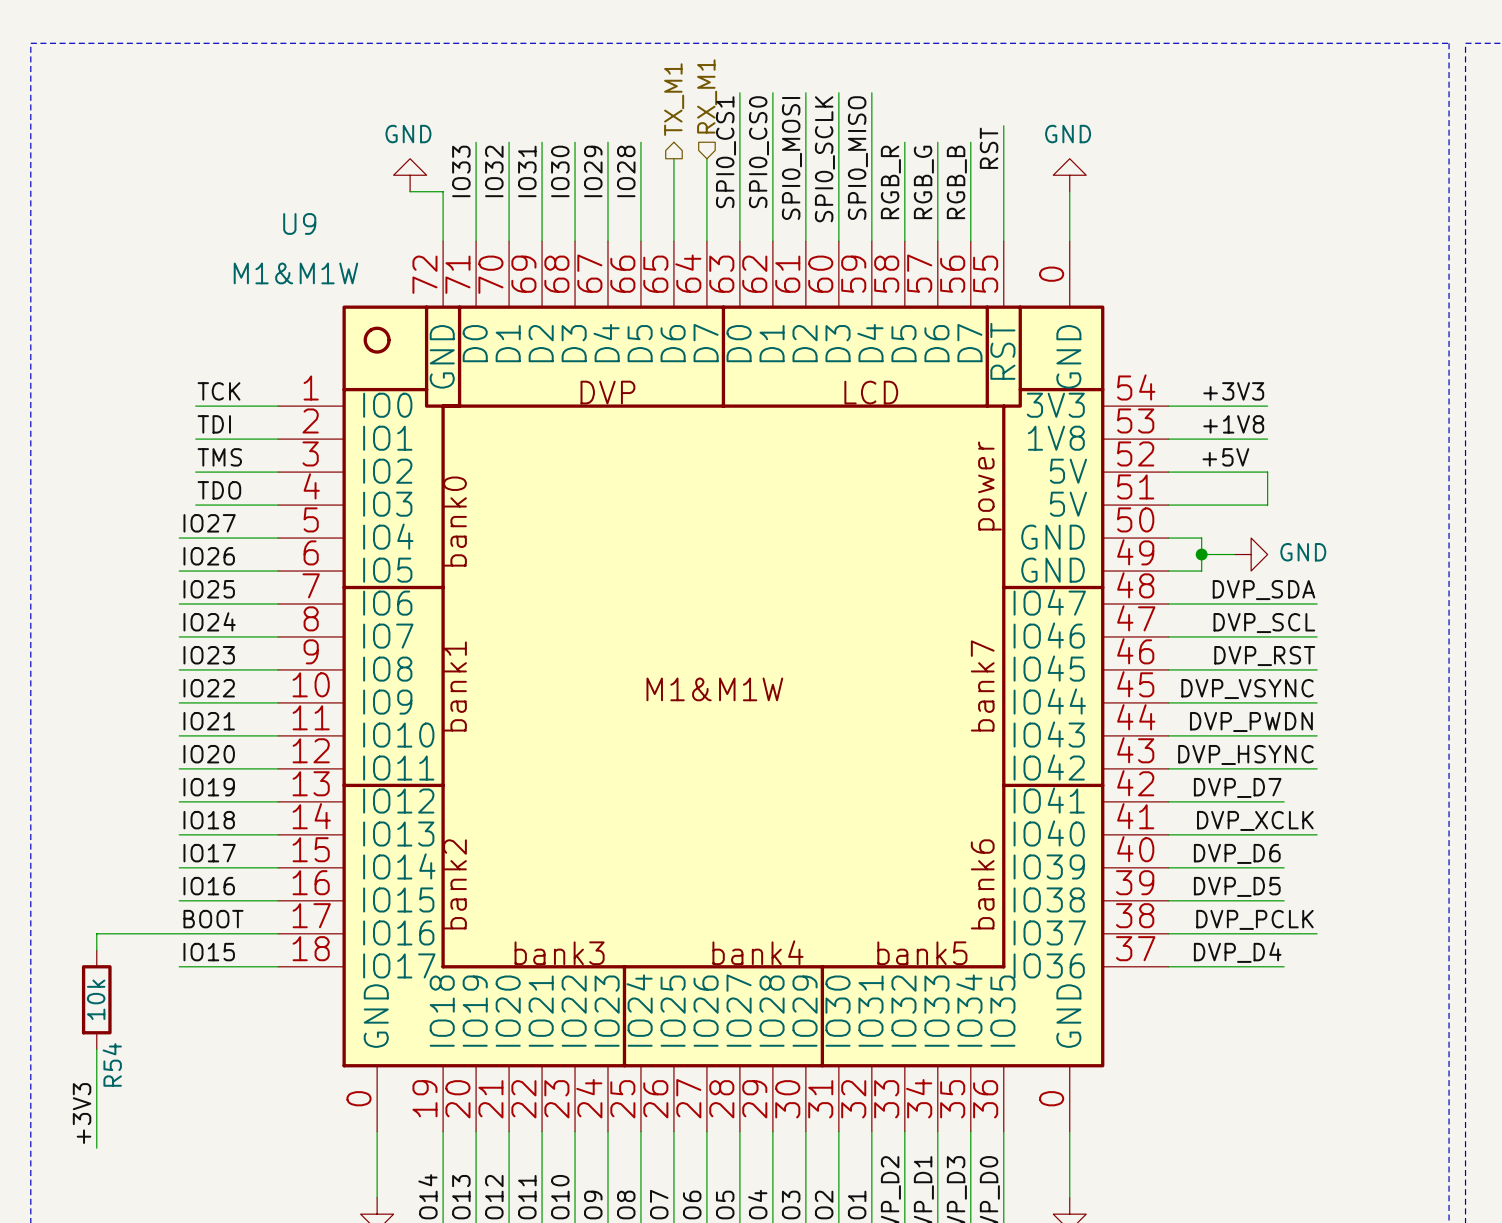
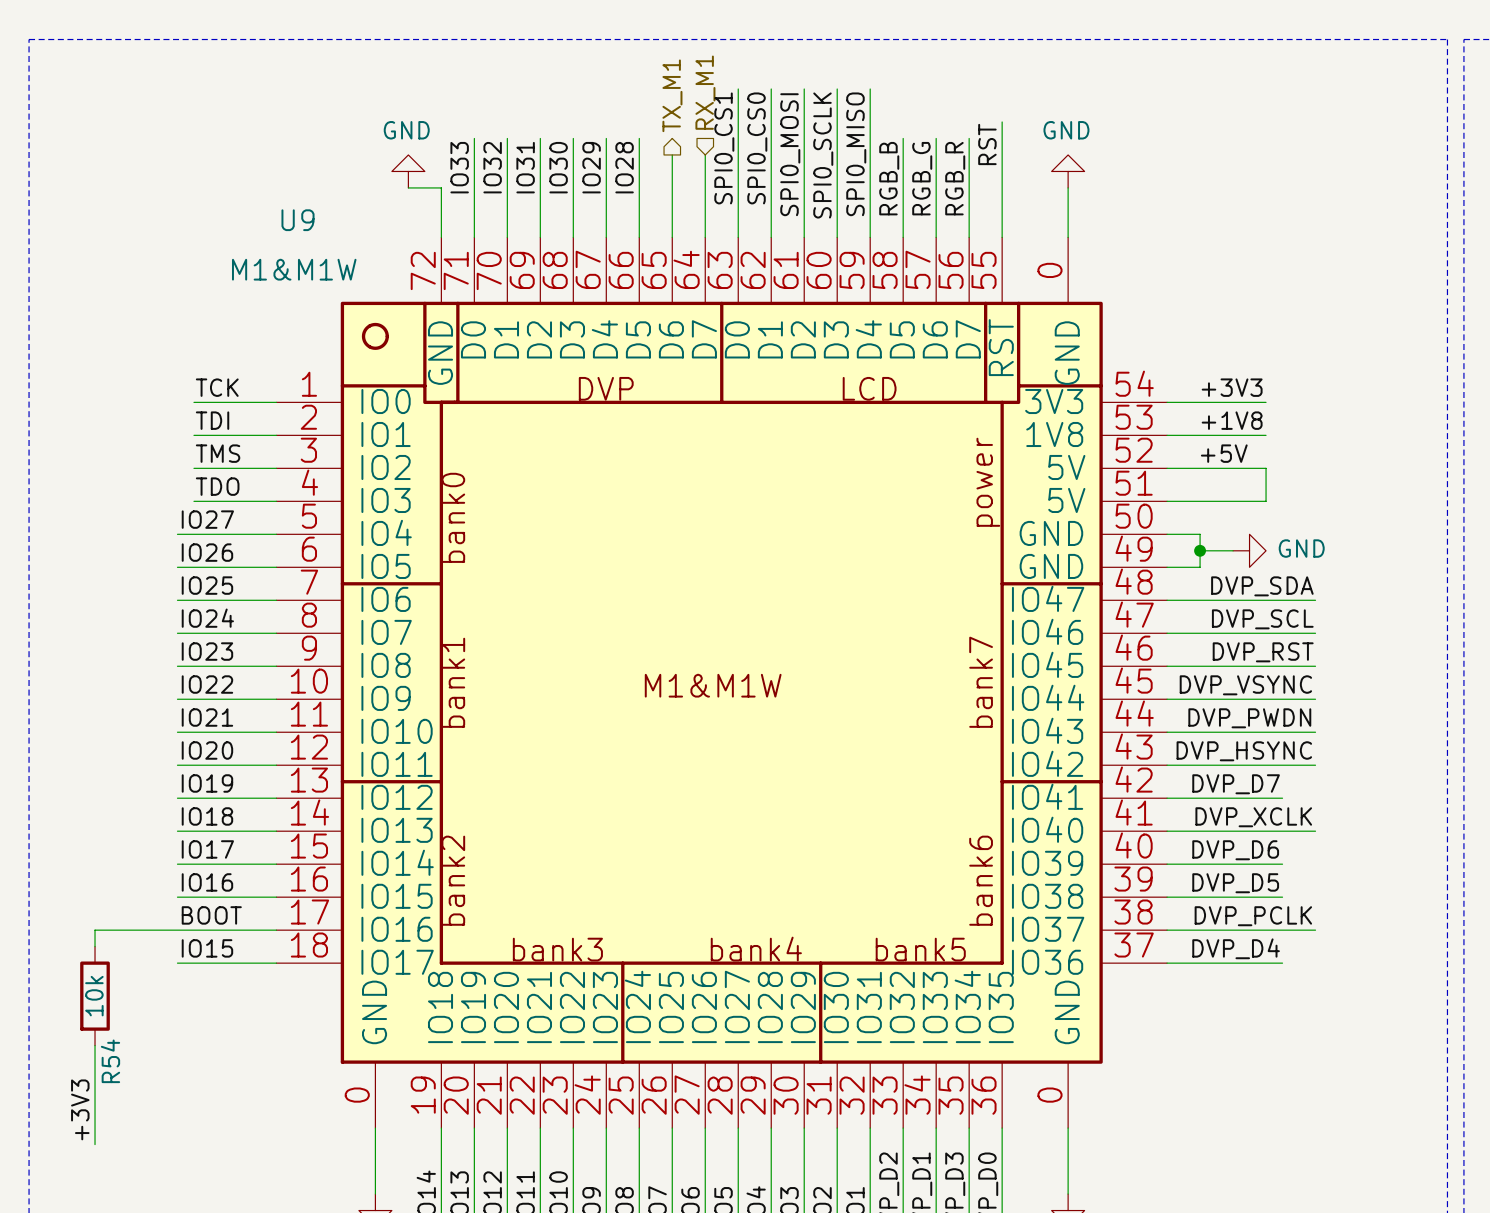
label: RGB_R (890, 182) -> RGB_B (889, 178)
label: RGB_B (956, 182) -> RGB_R (955, 178)

